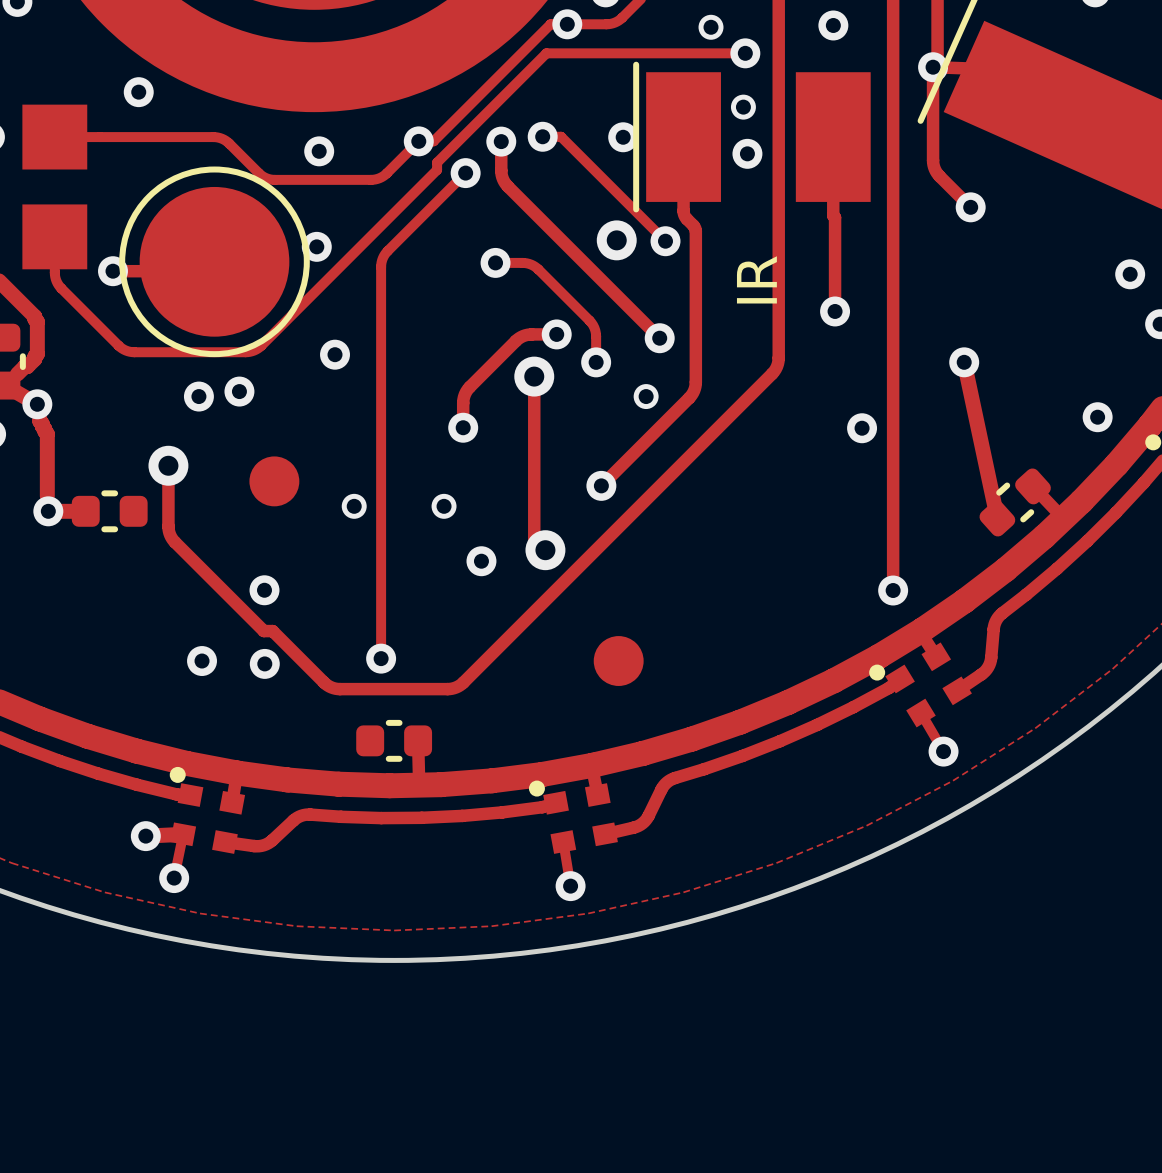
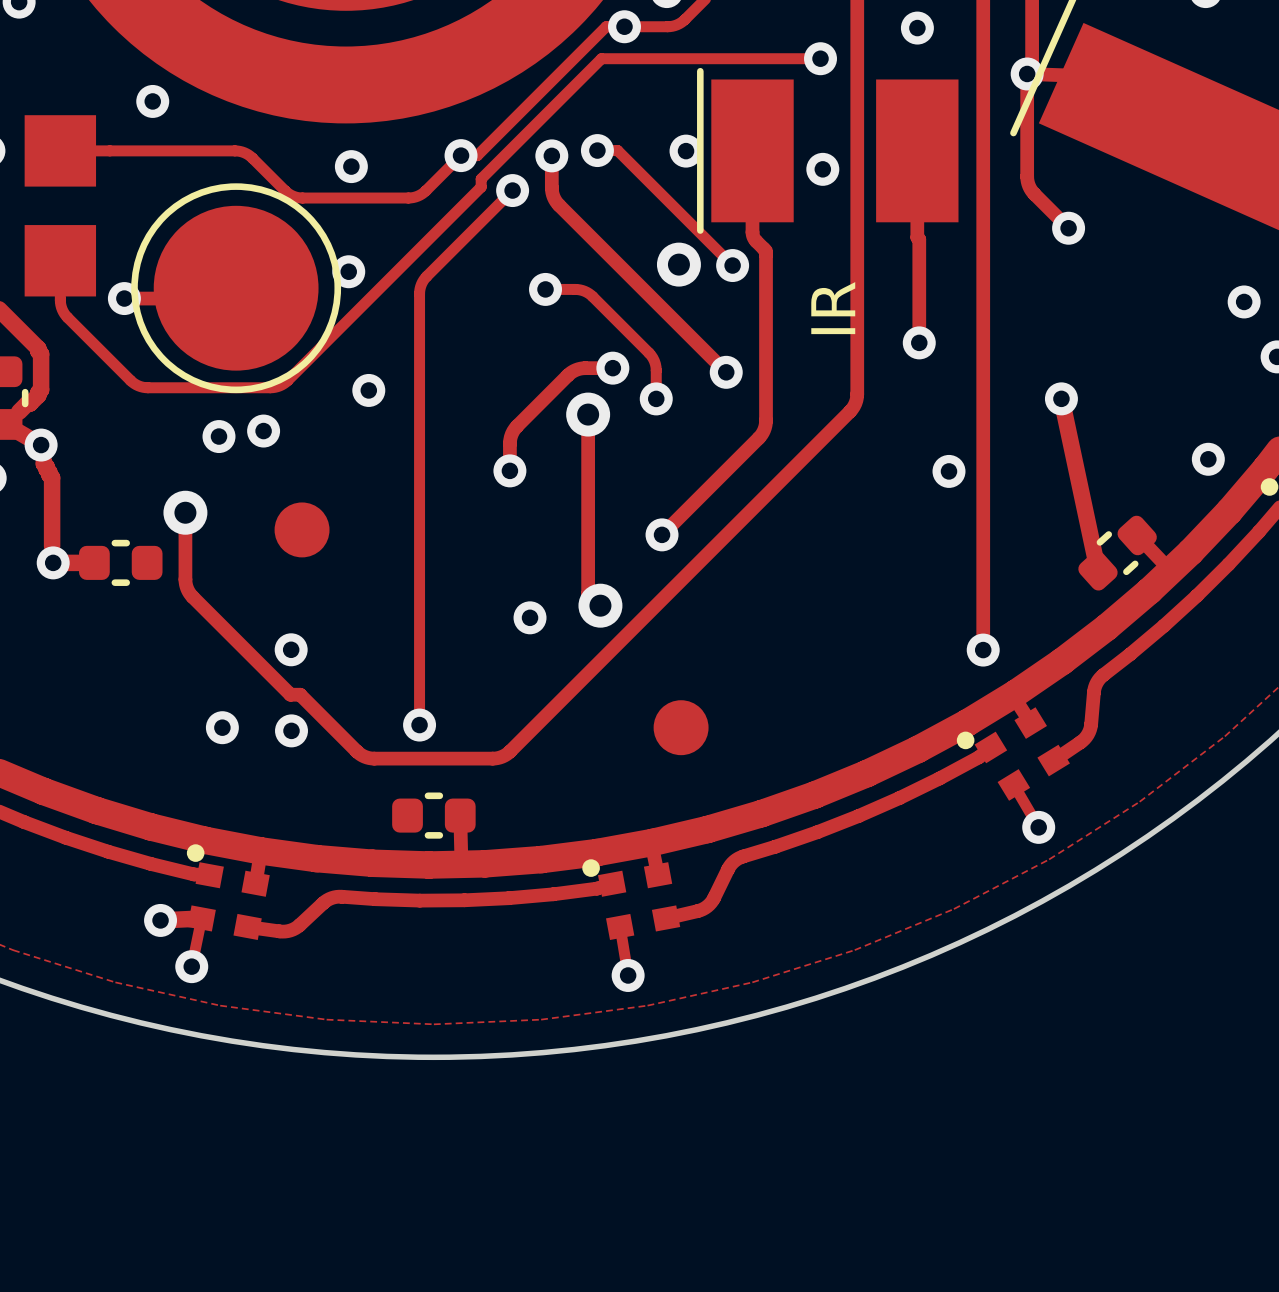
via: (711, 27) -> none
via: (743, 107) -> none
via: (646, 396) -> none
via: (354, 506) -> none
via: (444, 506) -> none

